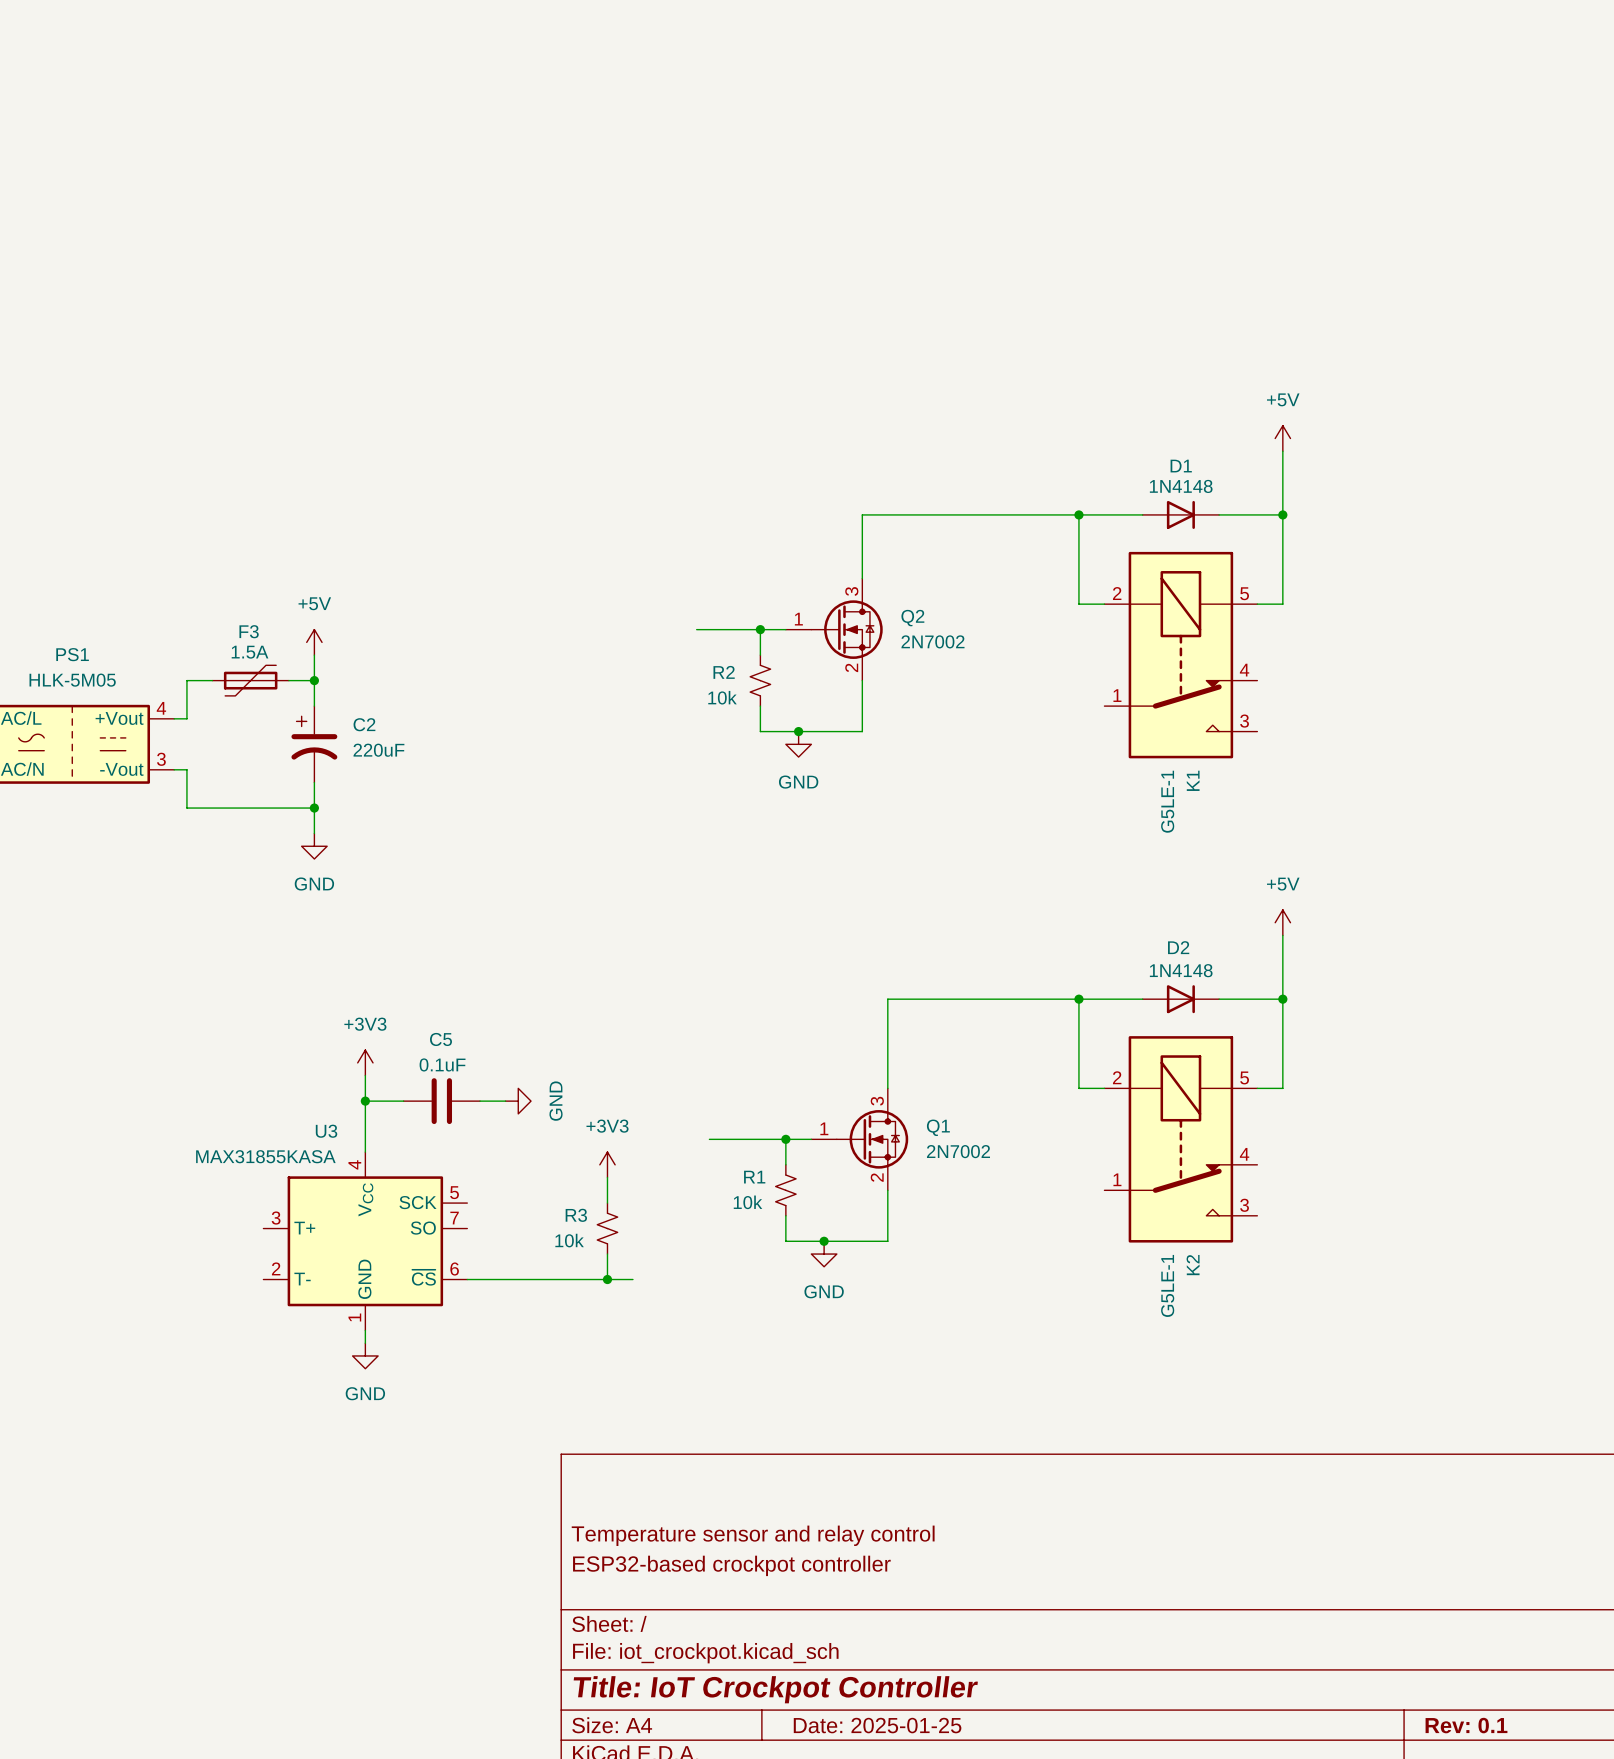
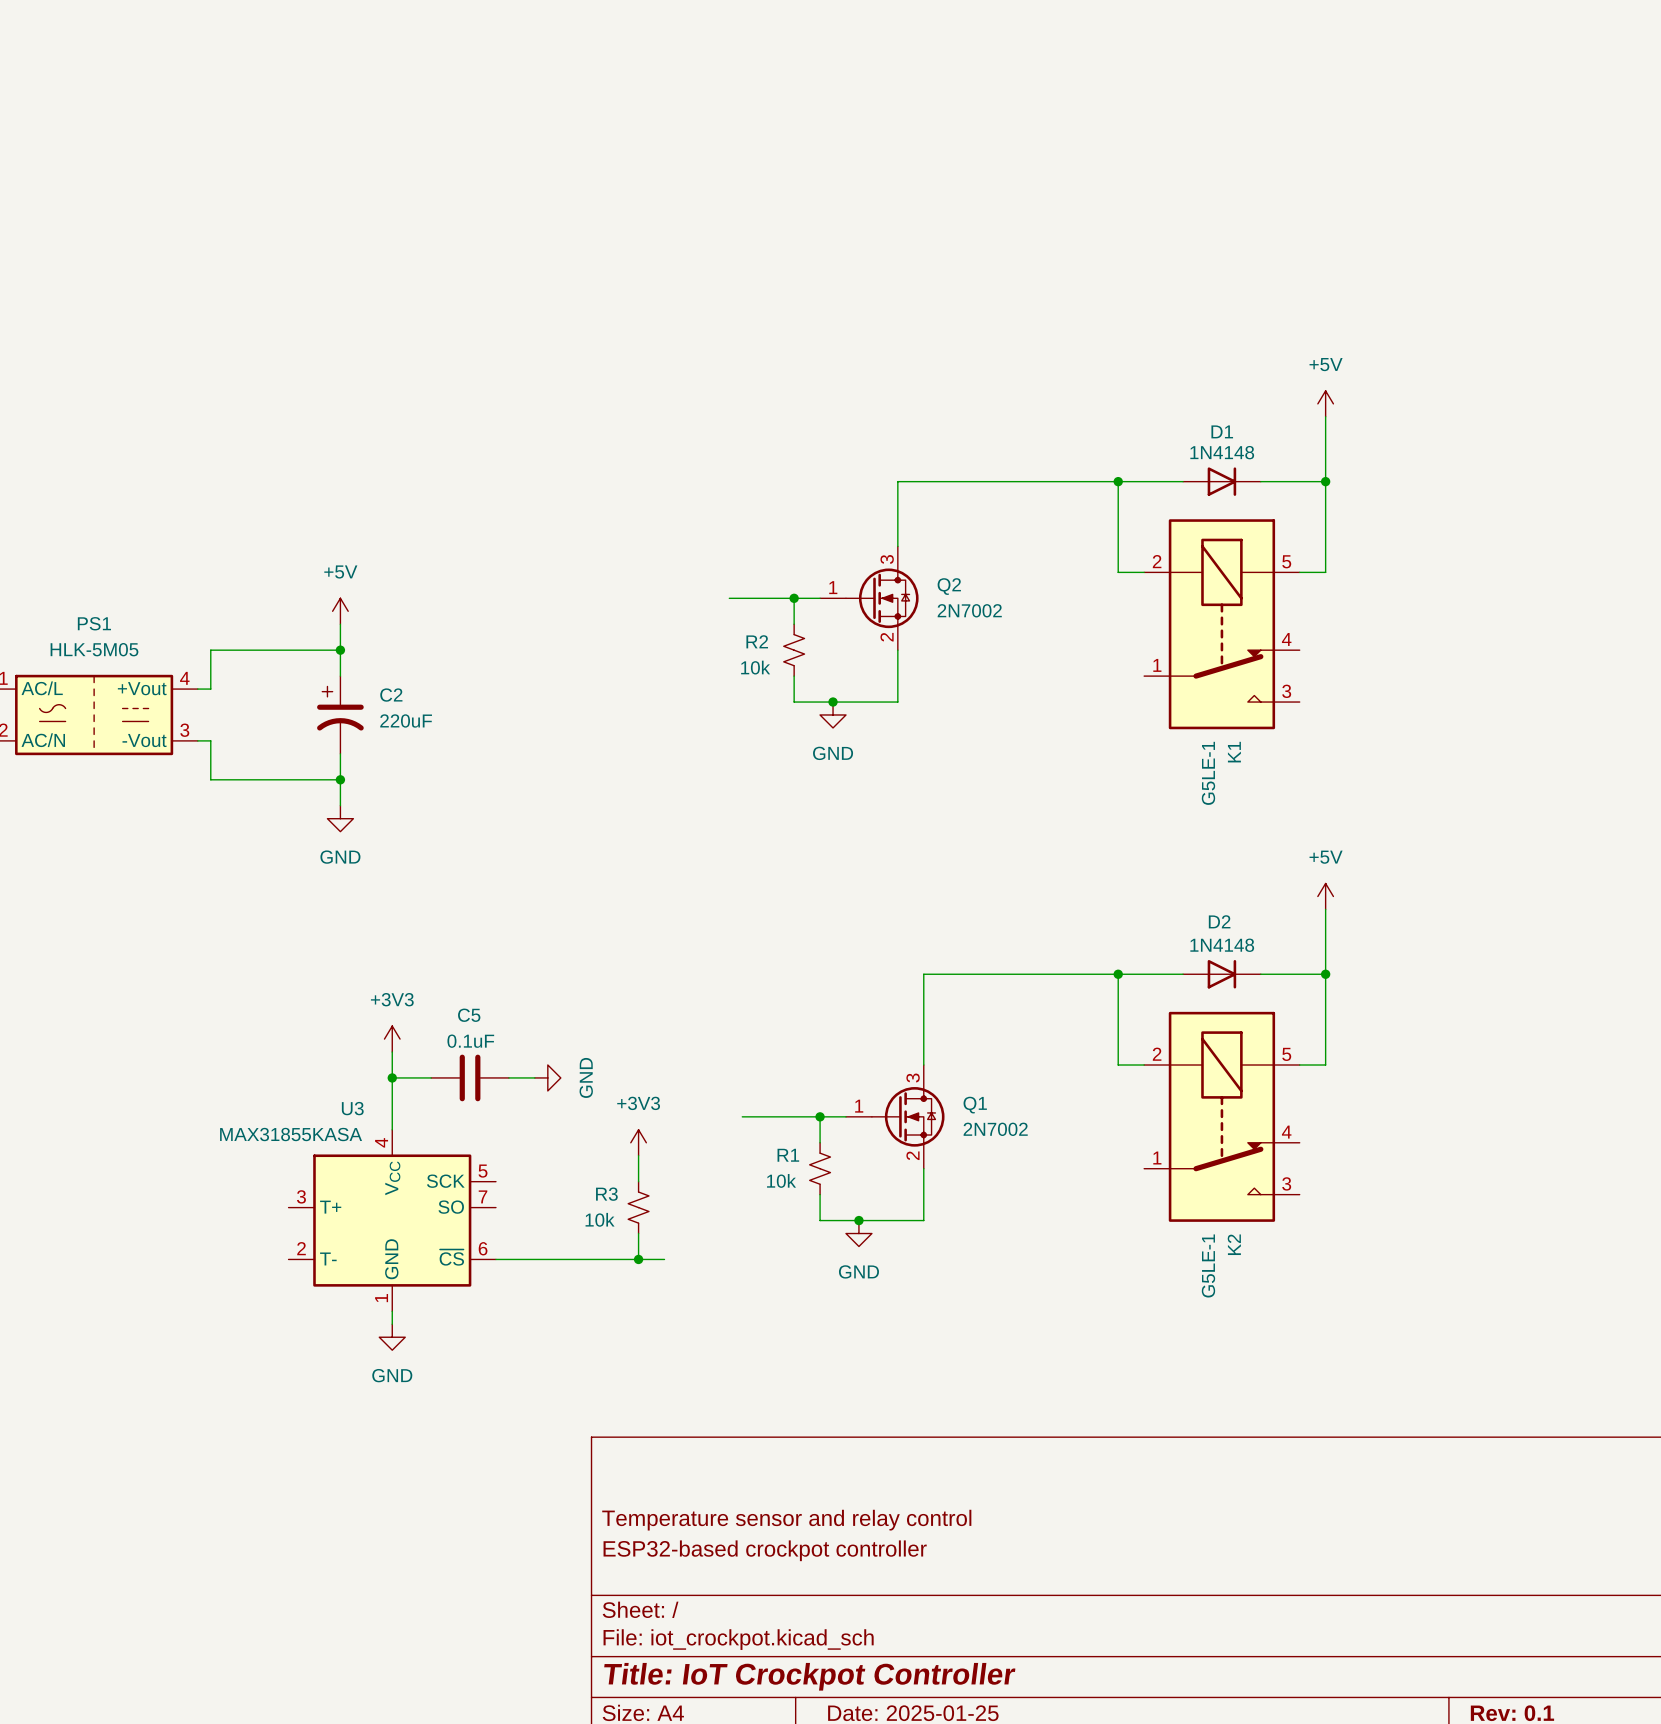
F3: 1.5A (250, 680) -> none

